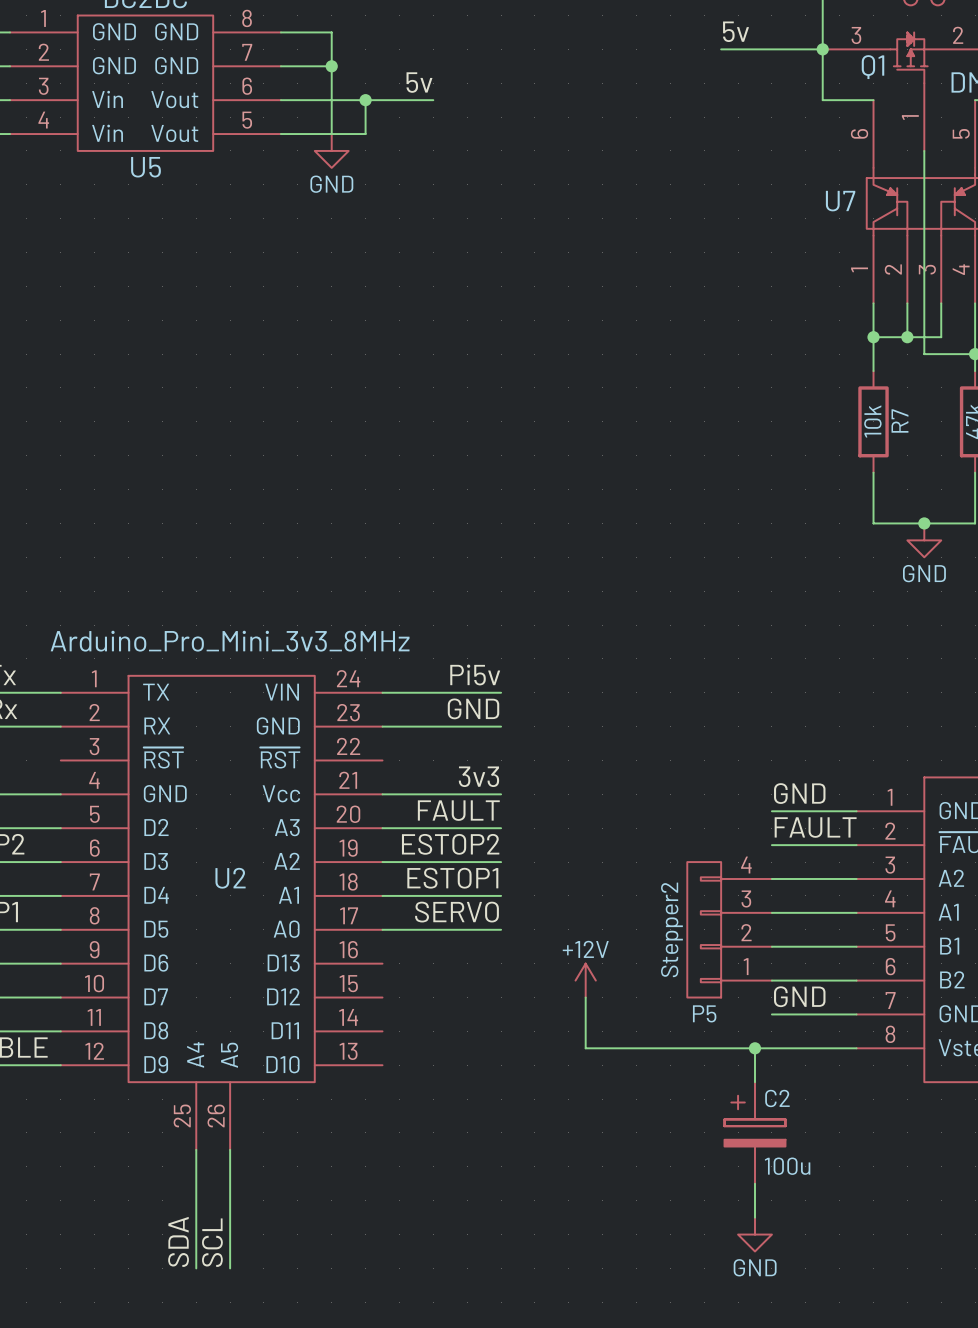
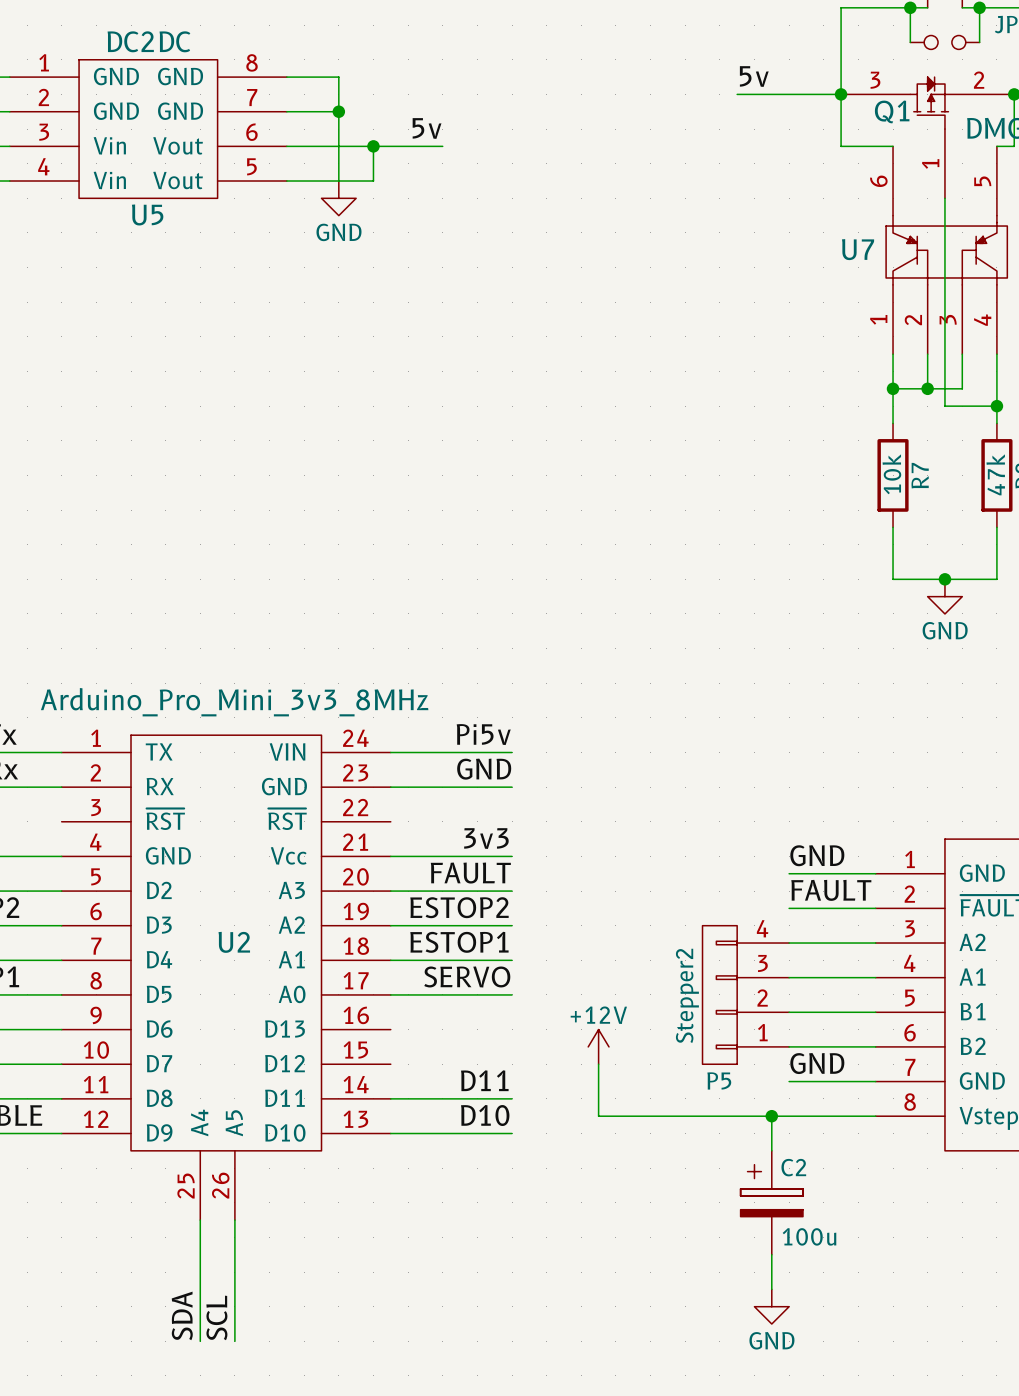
label: none -> D11 (484, 1080)
wire: none -> (390, 1098) (512, 1098)
label: none -> D10 (485, 1115)
wire: none -> (390, 1133) (512, 1133)

